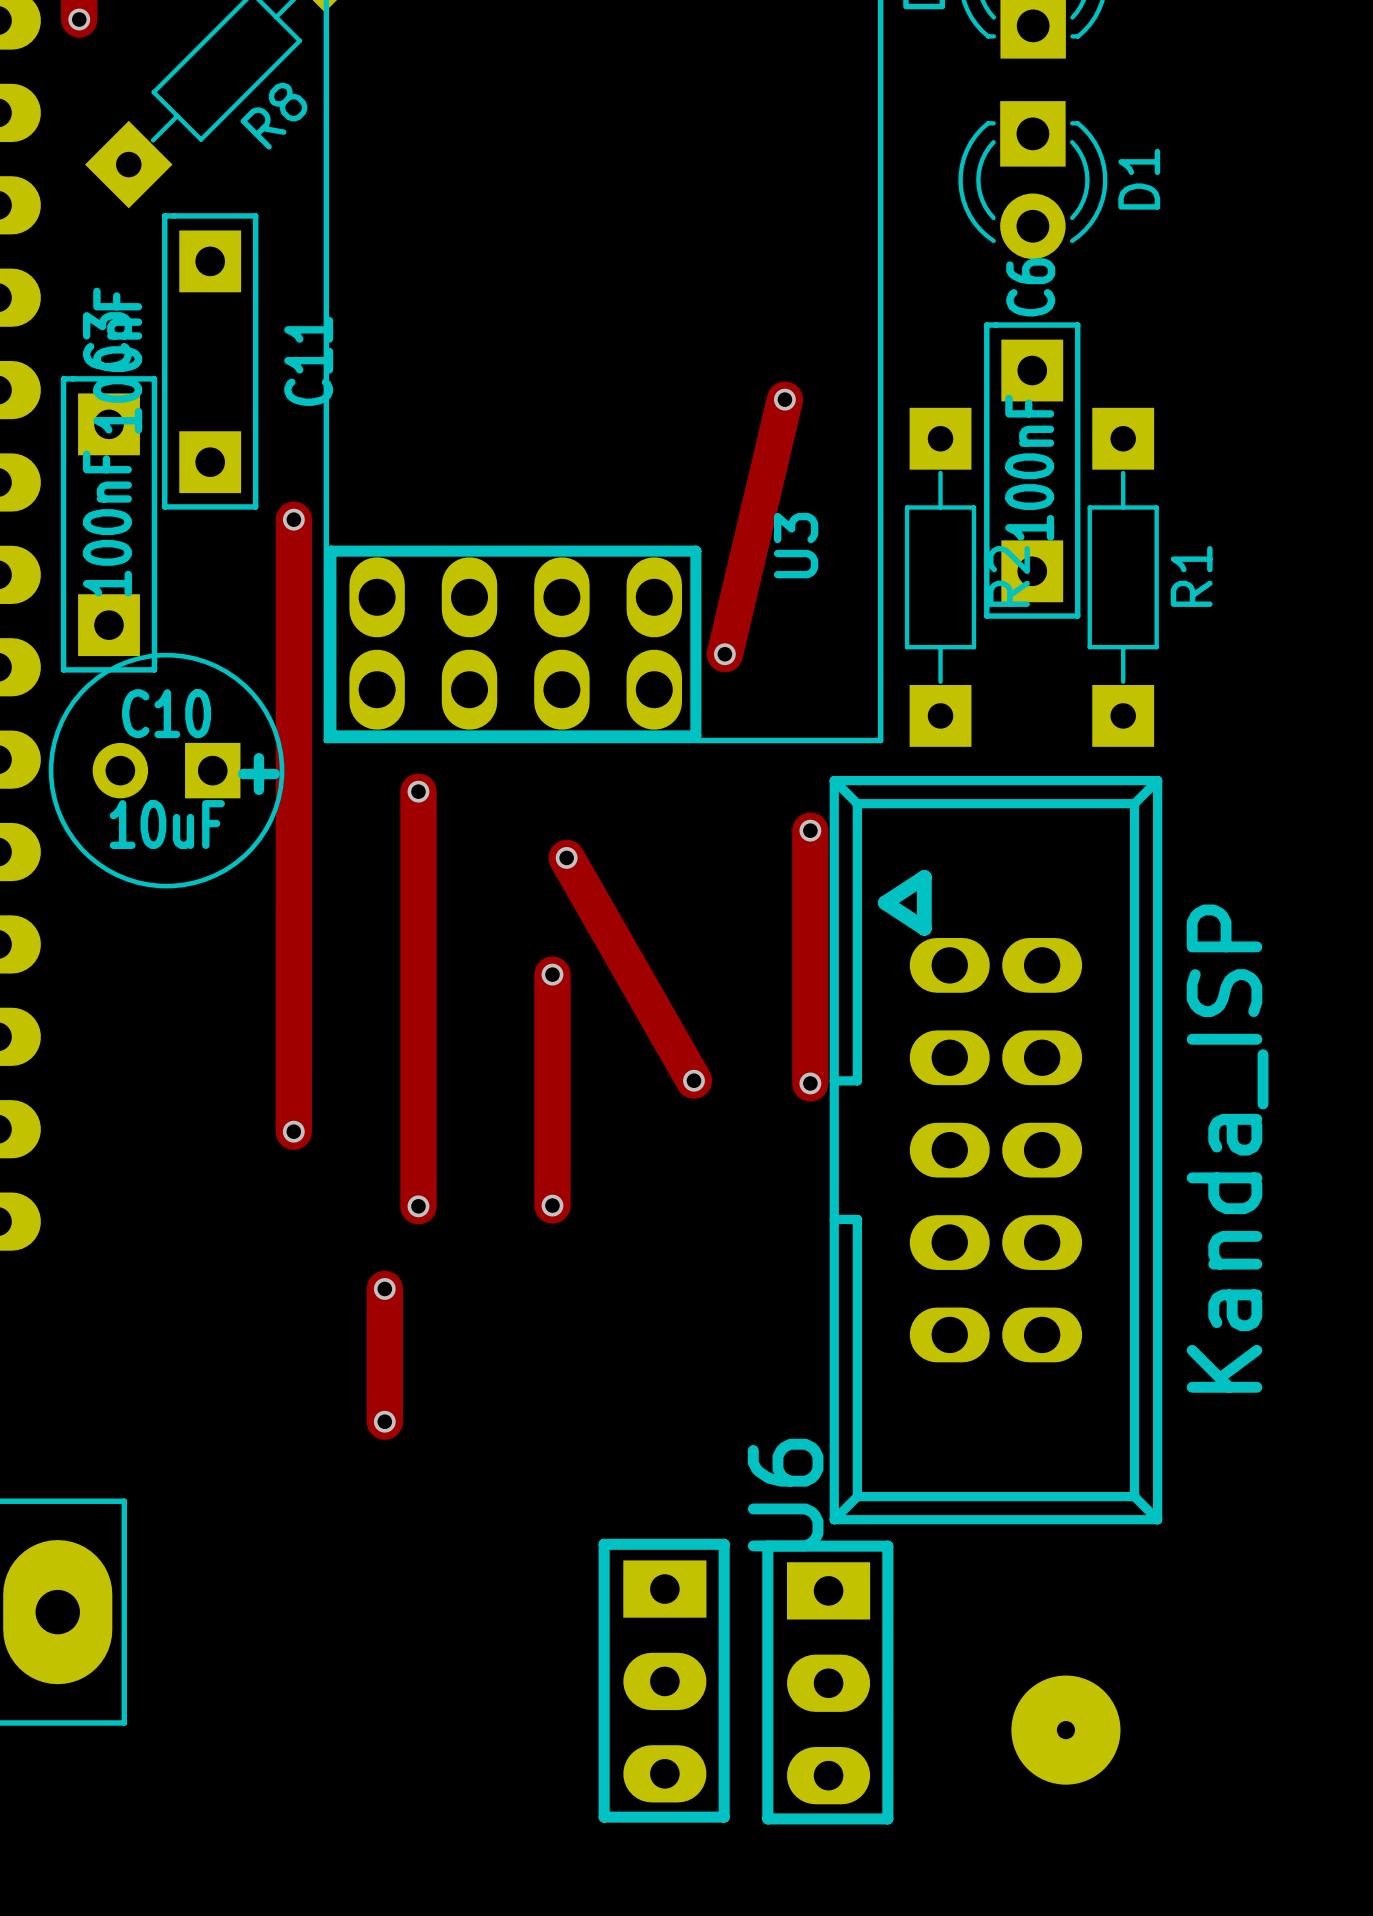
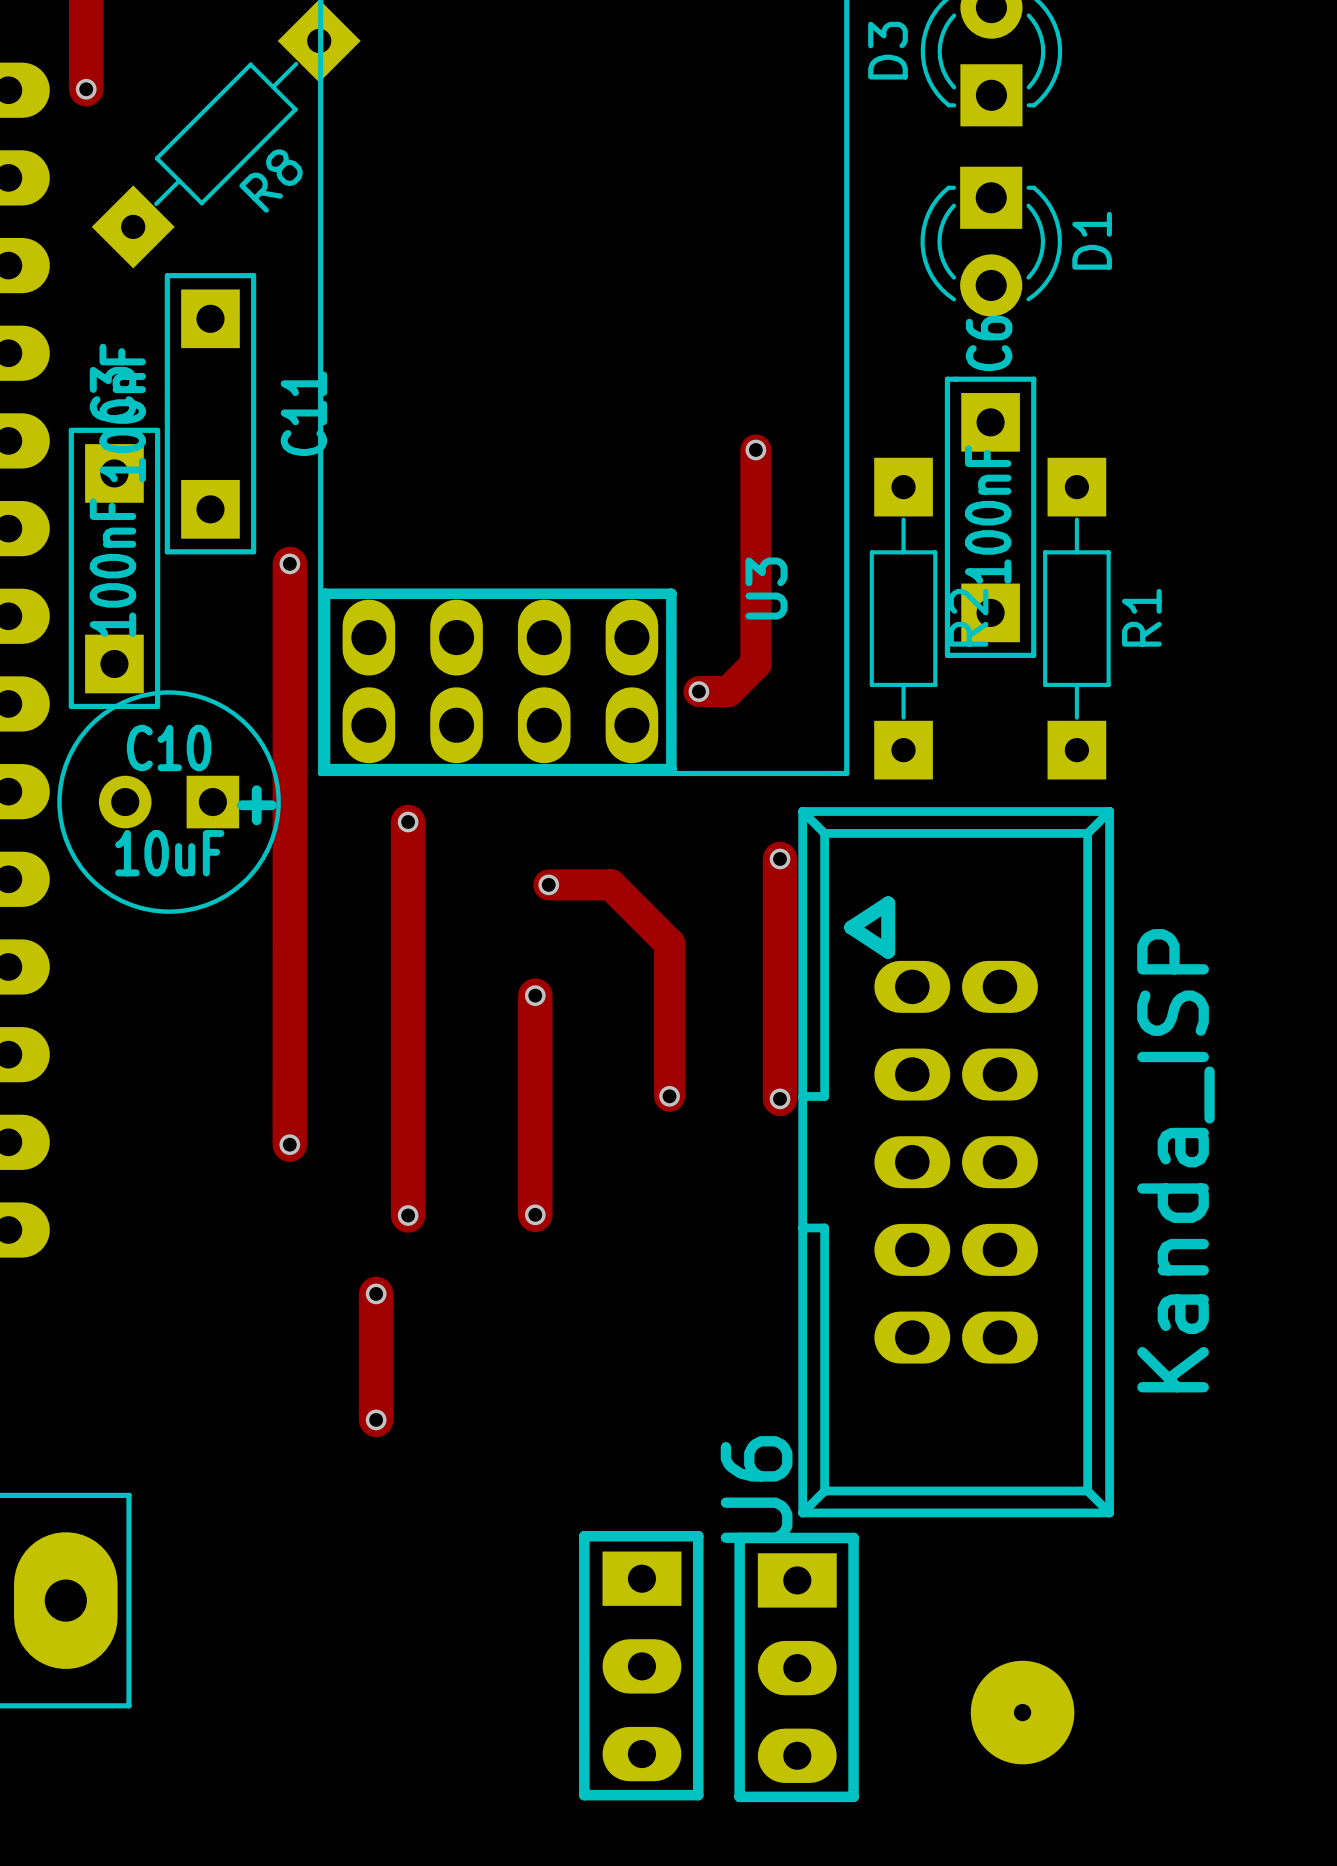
track: (784, 399) (724, 654) -> (755, 449) (755, 663) (728, 691) (698, 691)
track: (566, 857) (693, 1080) -> (548, 884) (610, 884) (669, 943) (669, 1096)

